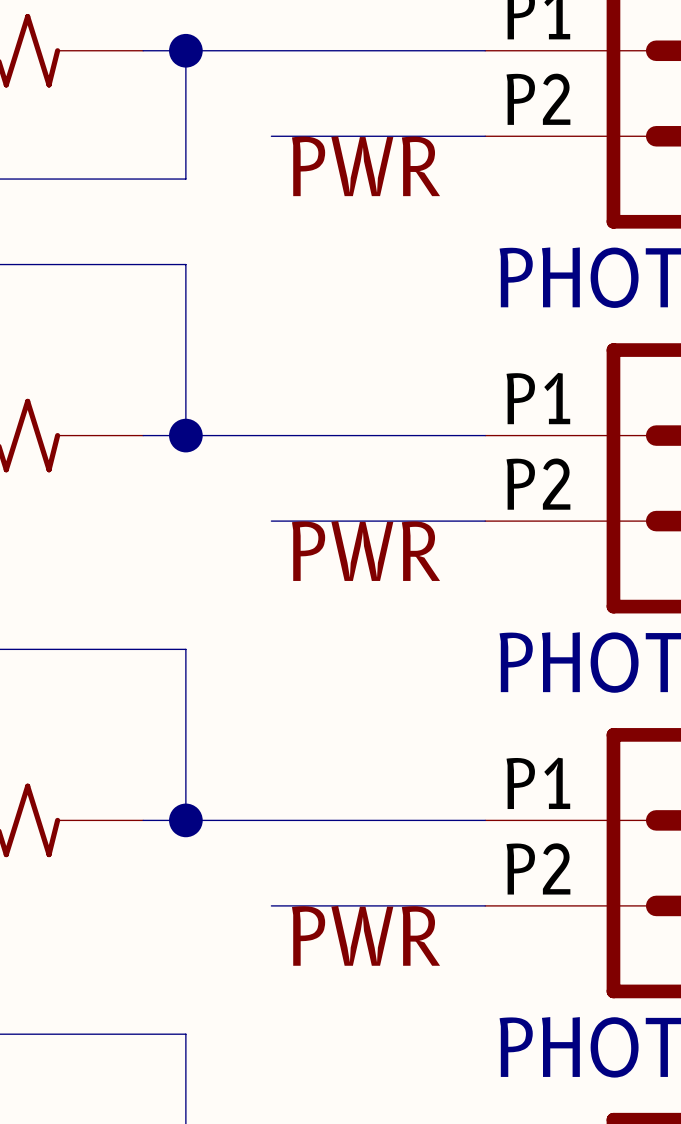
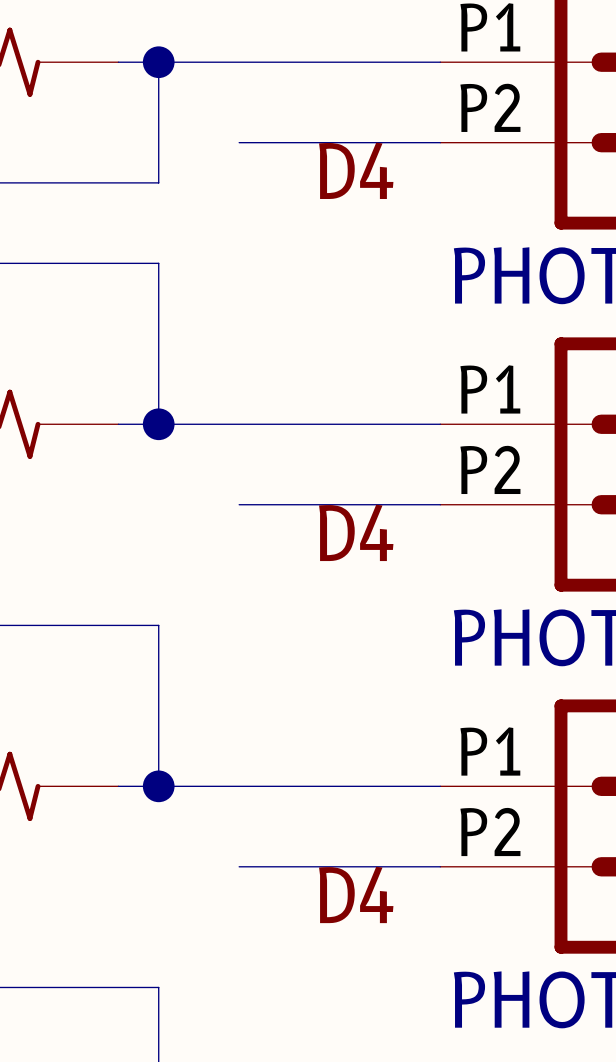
label: PWR (366, 166) -> D4 (356, 170)
label: PWR (366, 551) -> D4 (356, 532)
label: PWR (366, 935) -> D4 (356, 894)

